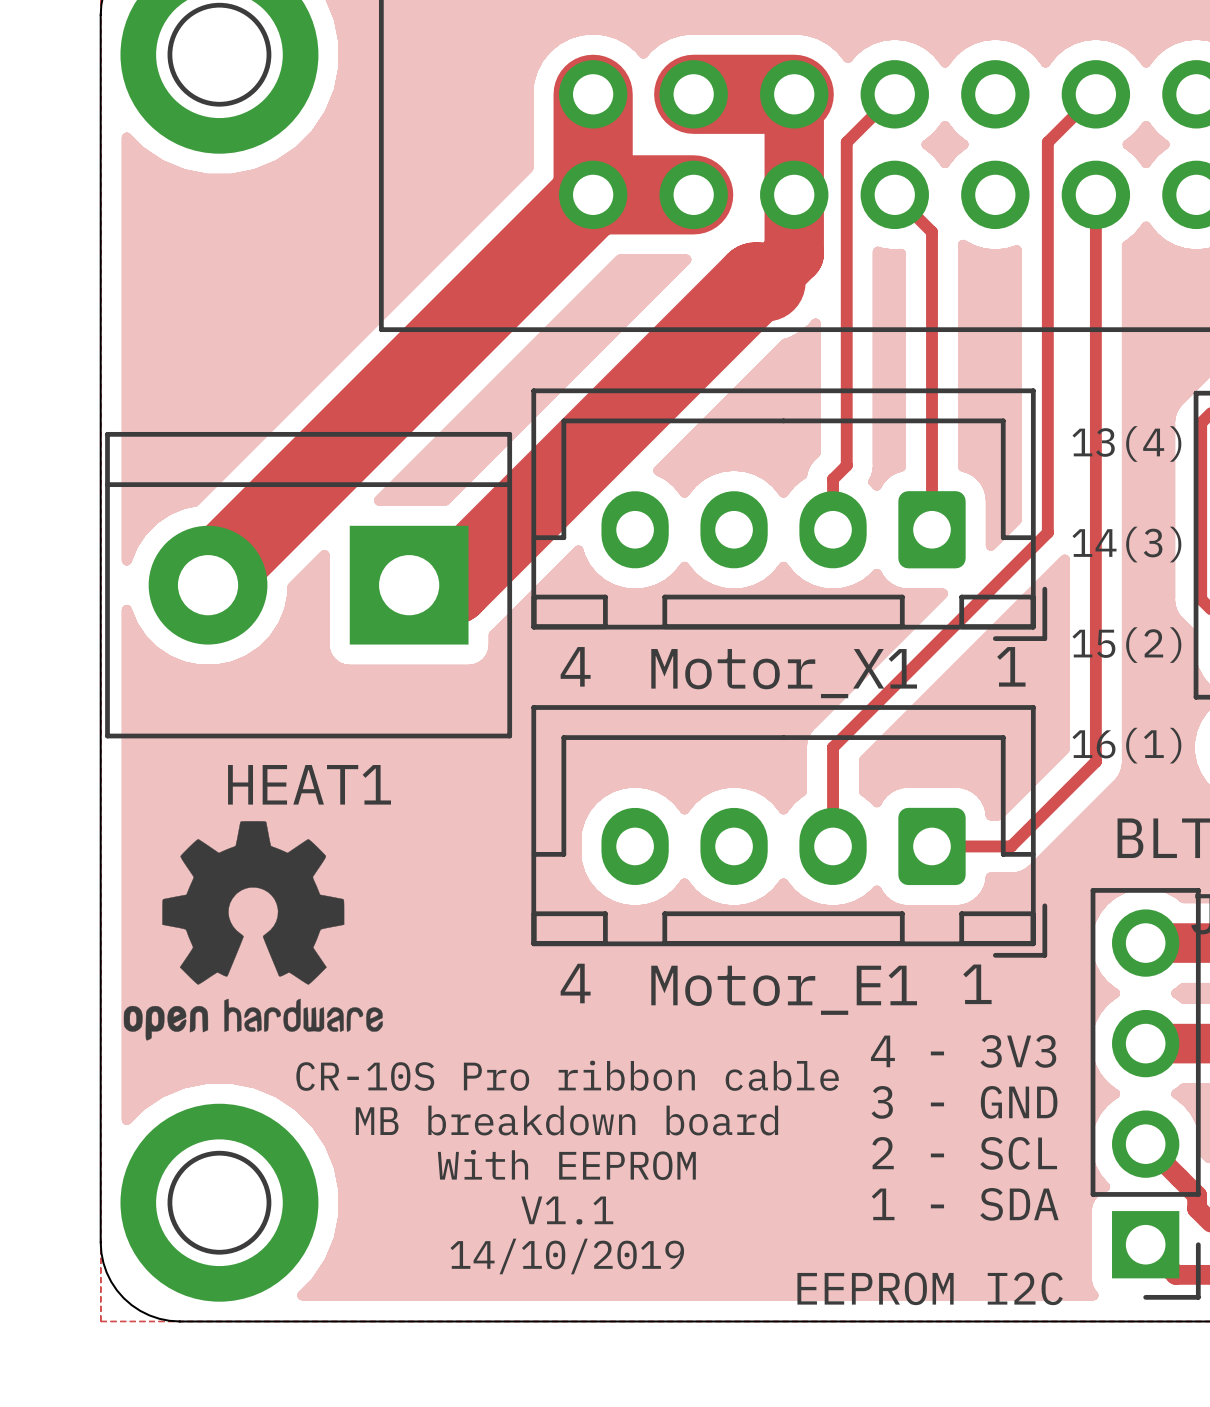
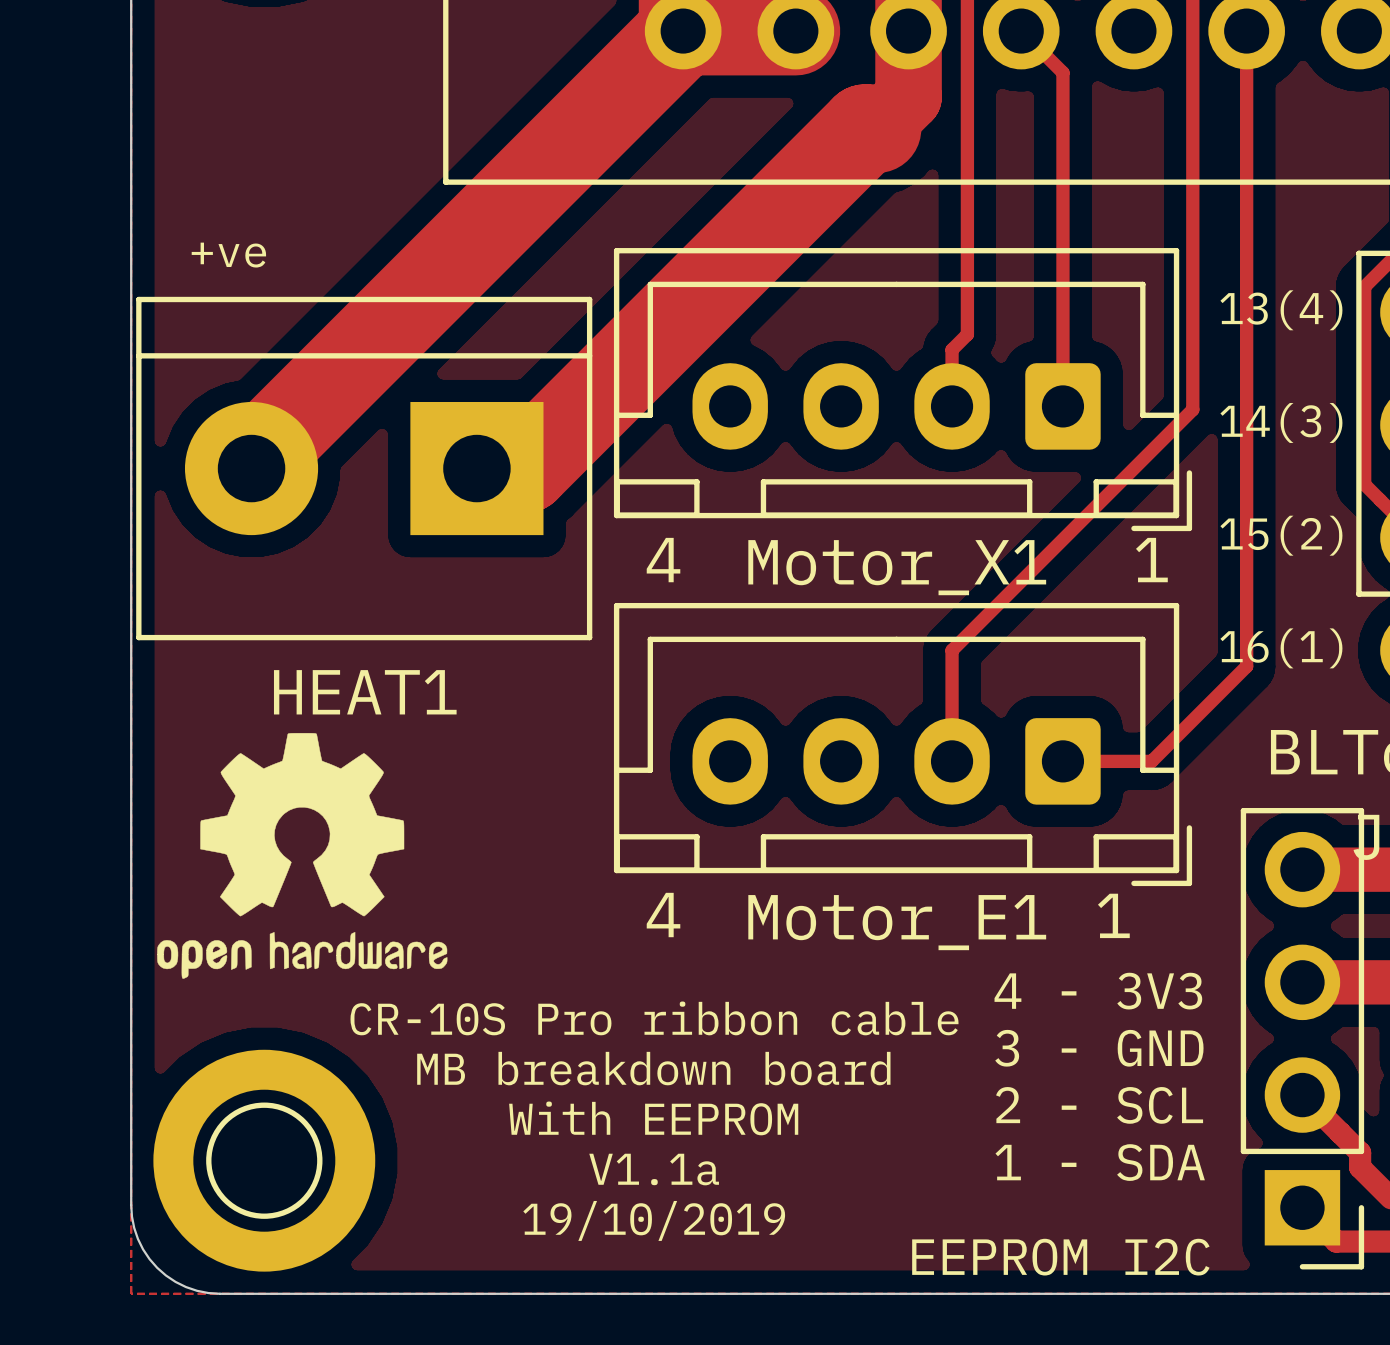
text: none -> +ve (228, 255)
text: V1.1 (567, 1210) -> V1.1a (654, 1169)
text: 14/10/2019 (567, 1256) -> 19/10/2019 (654, 1220)

